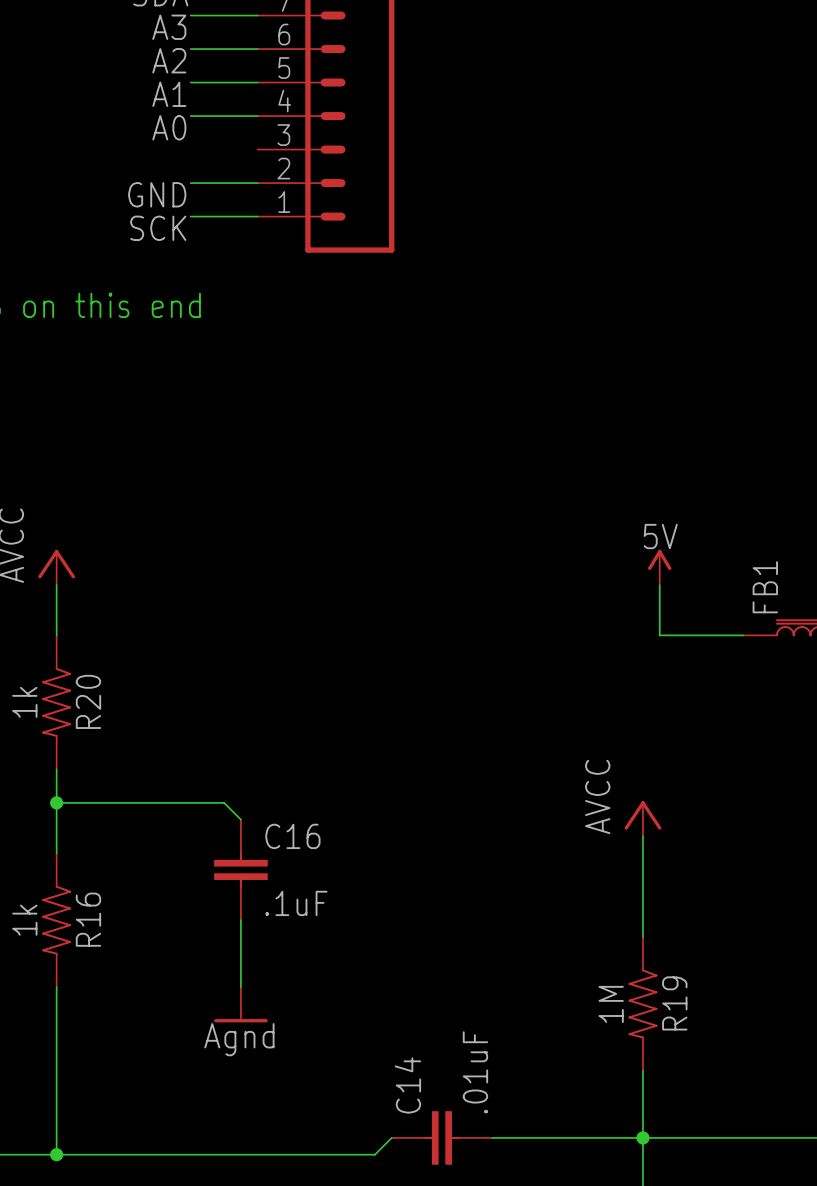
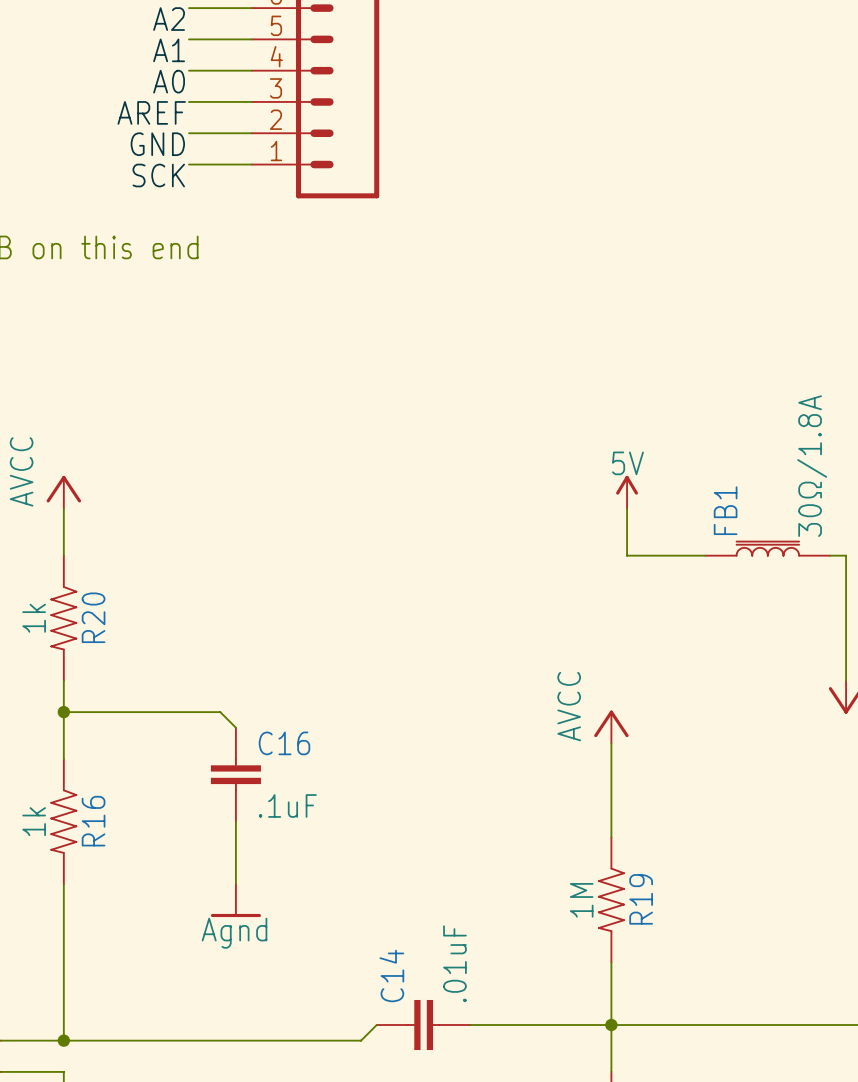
wire: none -> (189, 101) (251, 101)
label: none -> AREF (151, 112)

